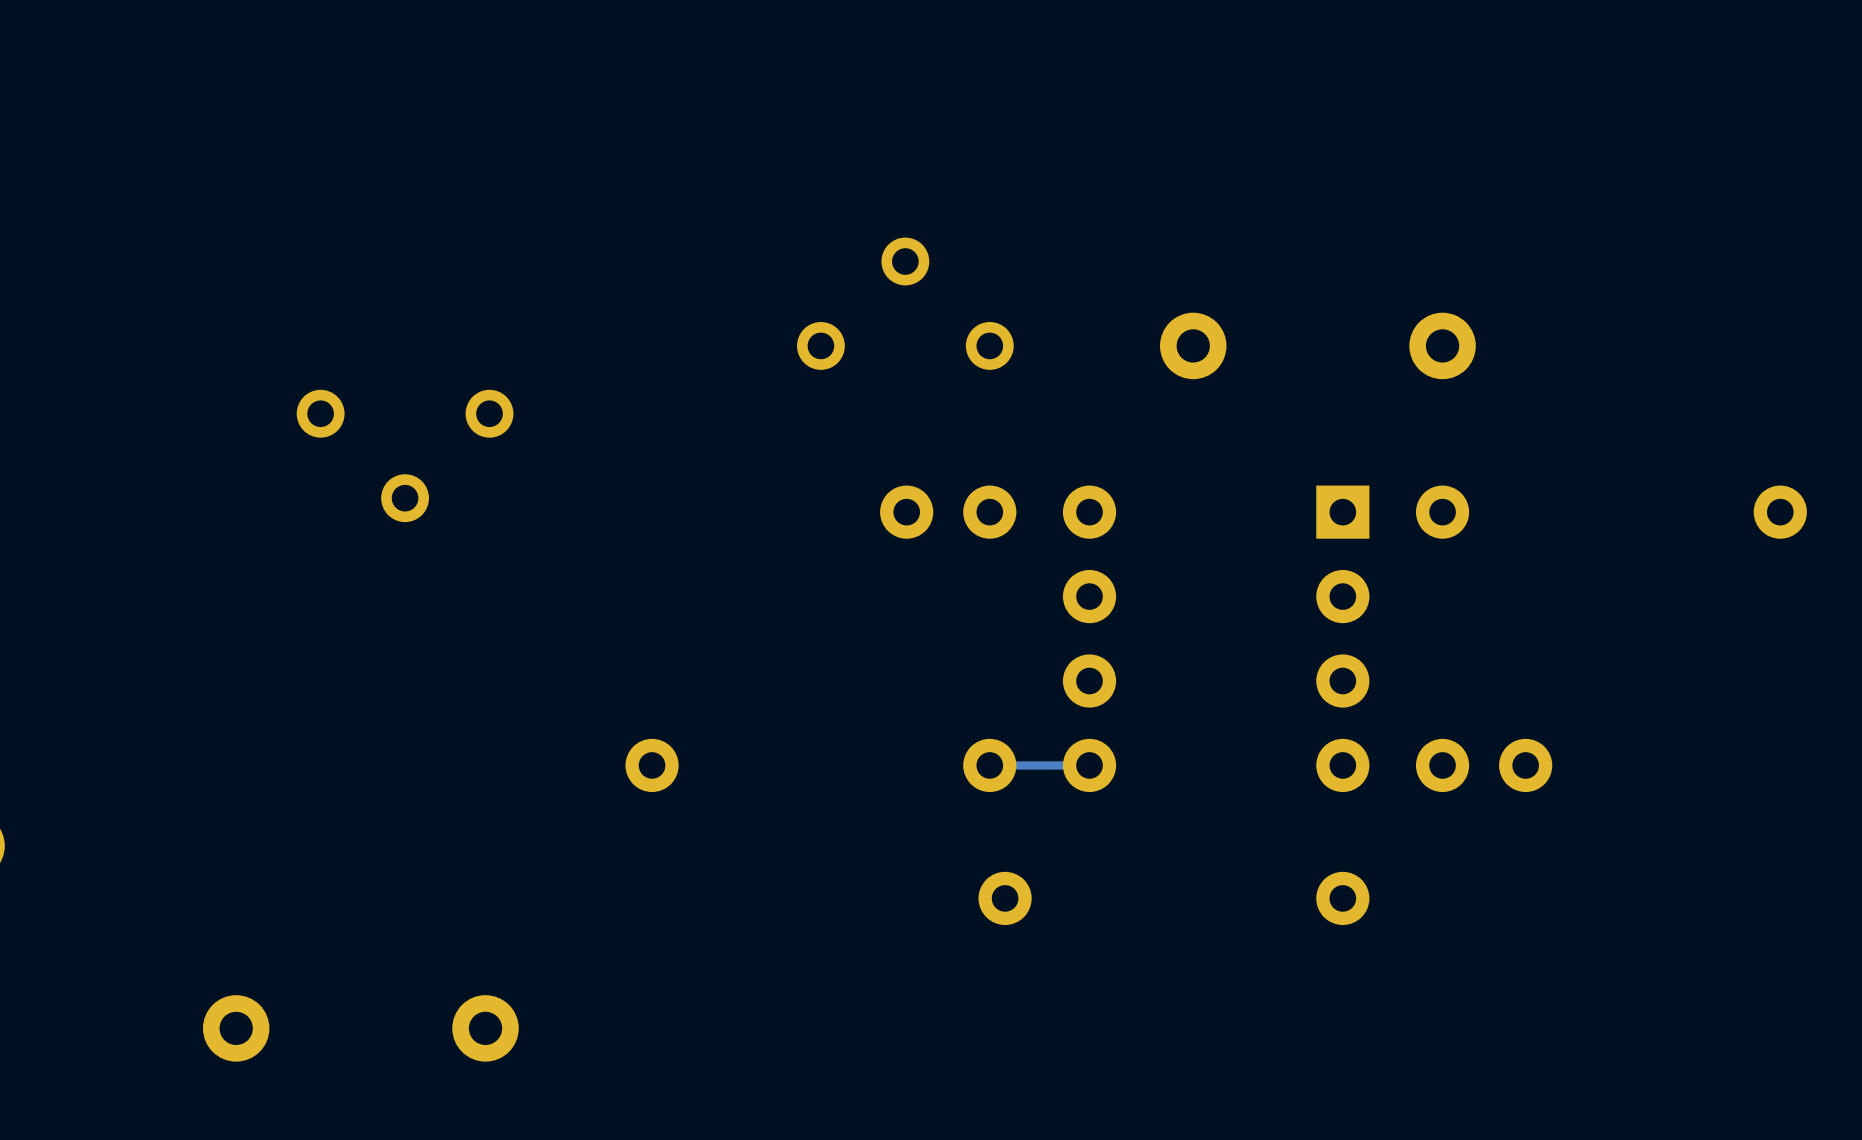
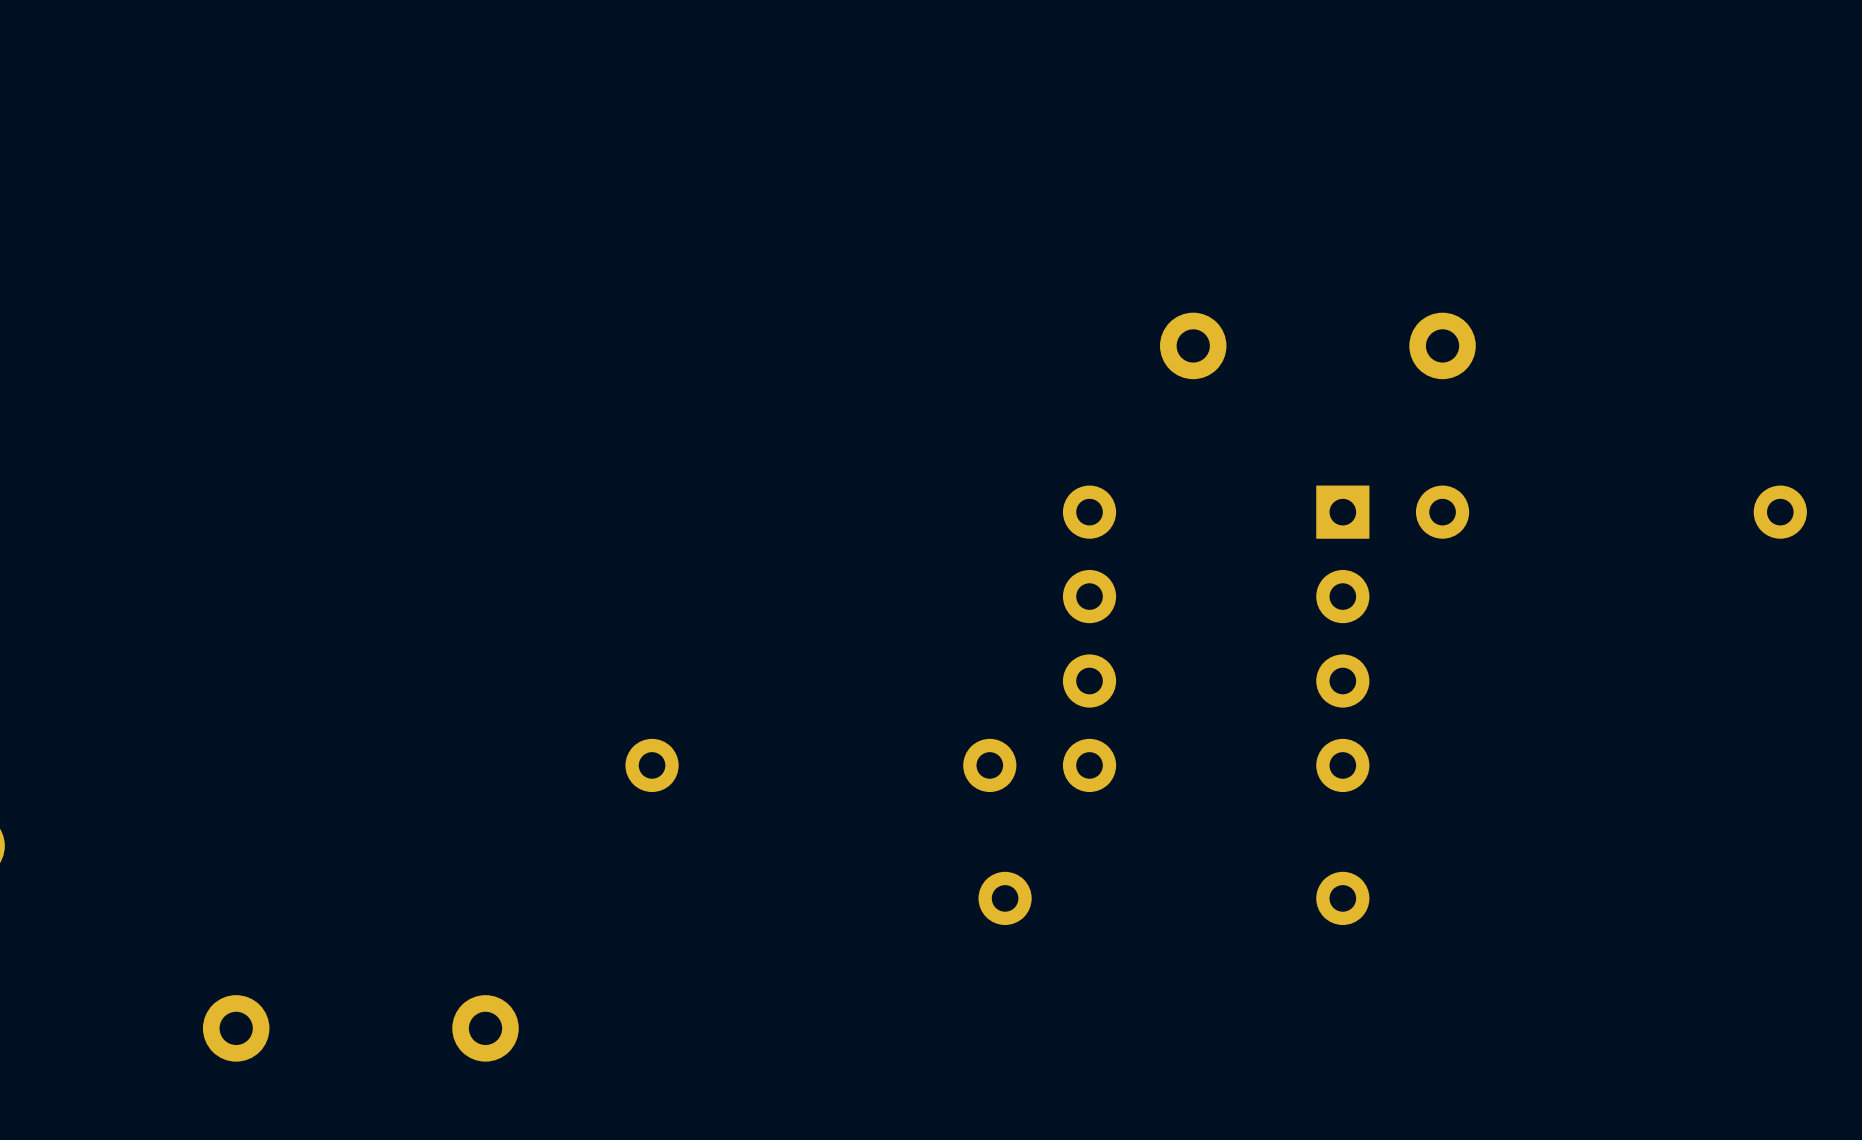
part: (905, 303) -> none
part: (405, 455) -> none
part: (948, 512) -> none
track: (1089, 765) (989, 765) -> none
part: (1484, 765) -> none

